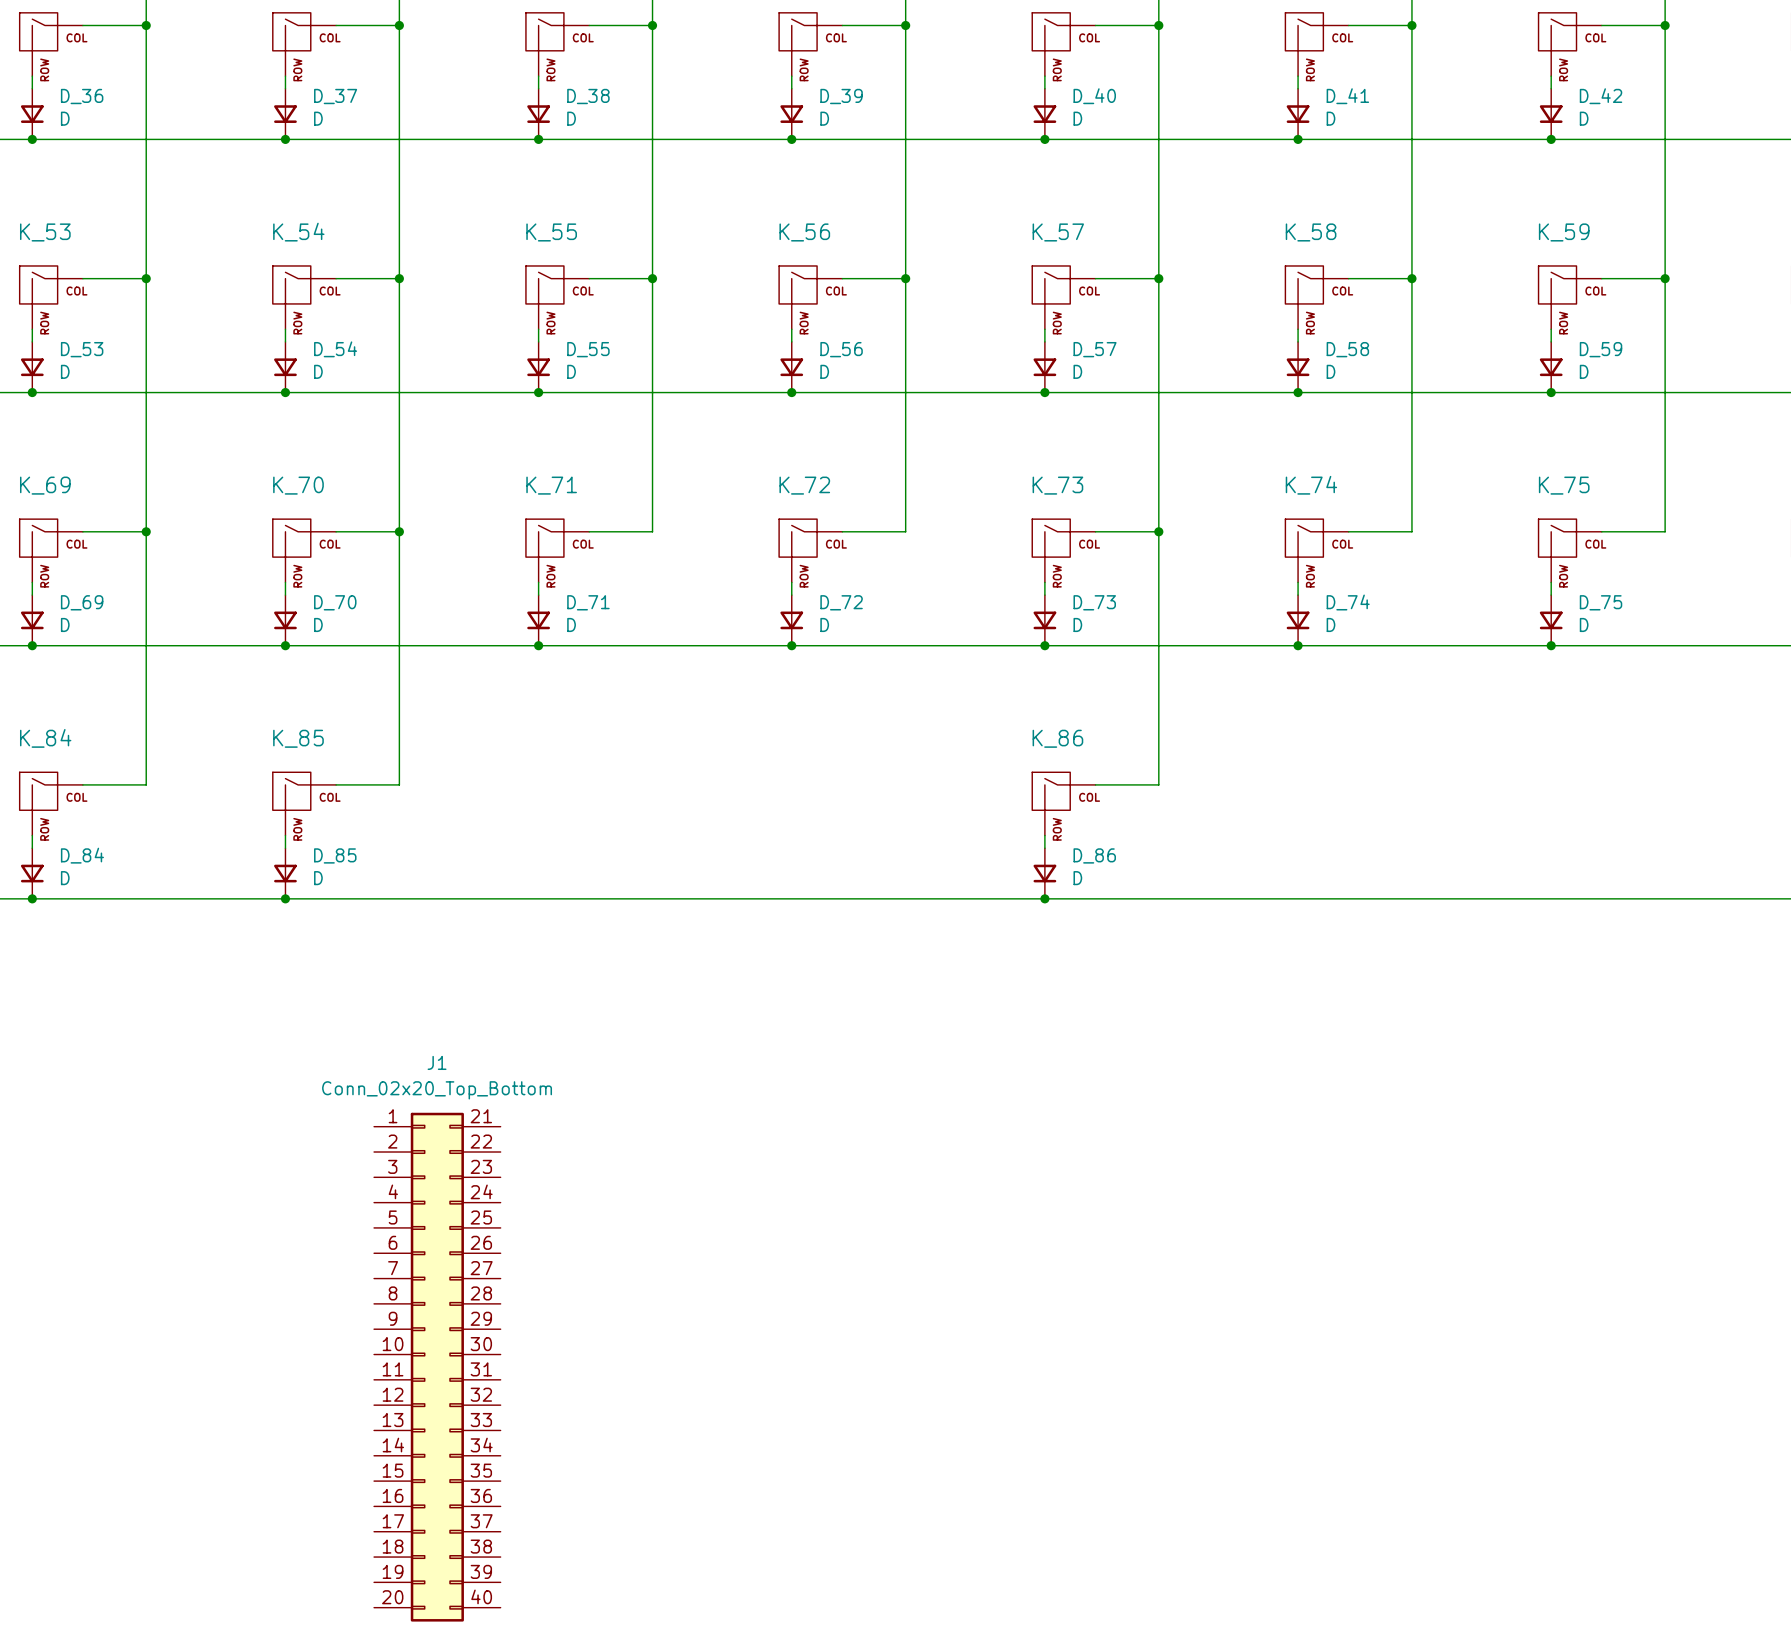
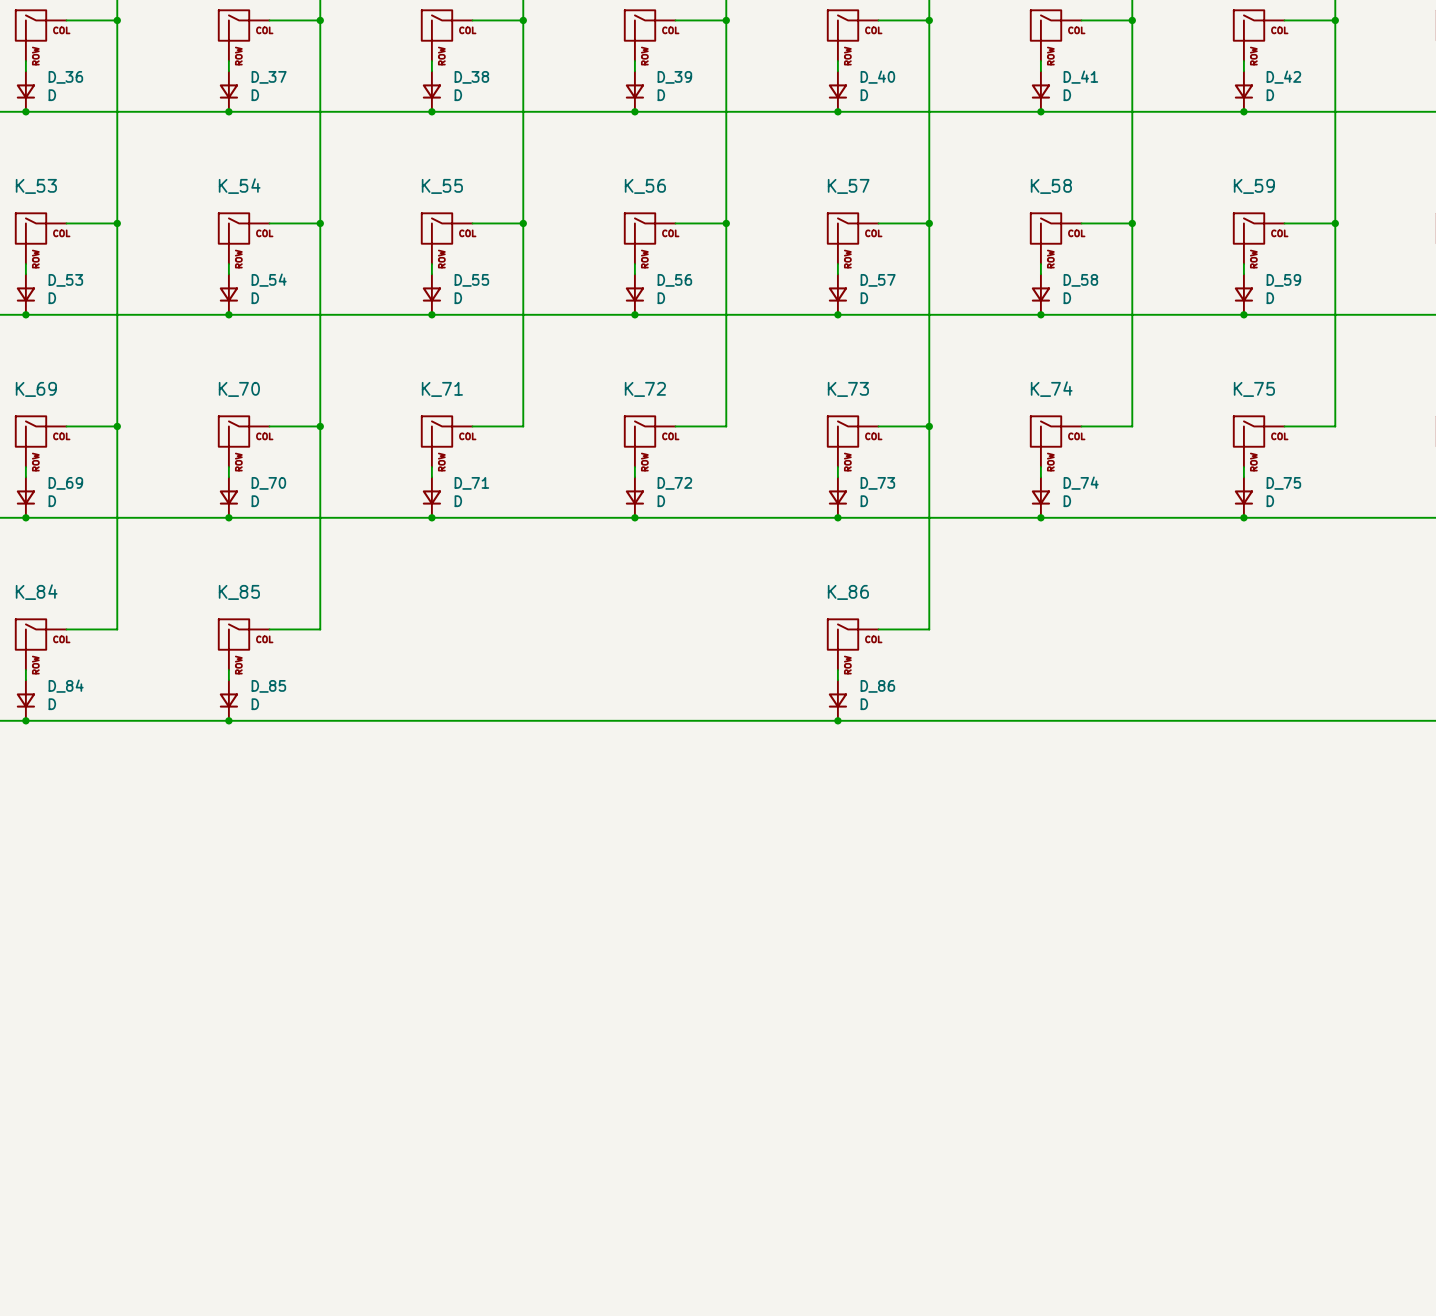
J1: Conn_02x20_Top_Bottom (437, 1367) -> none

